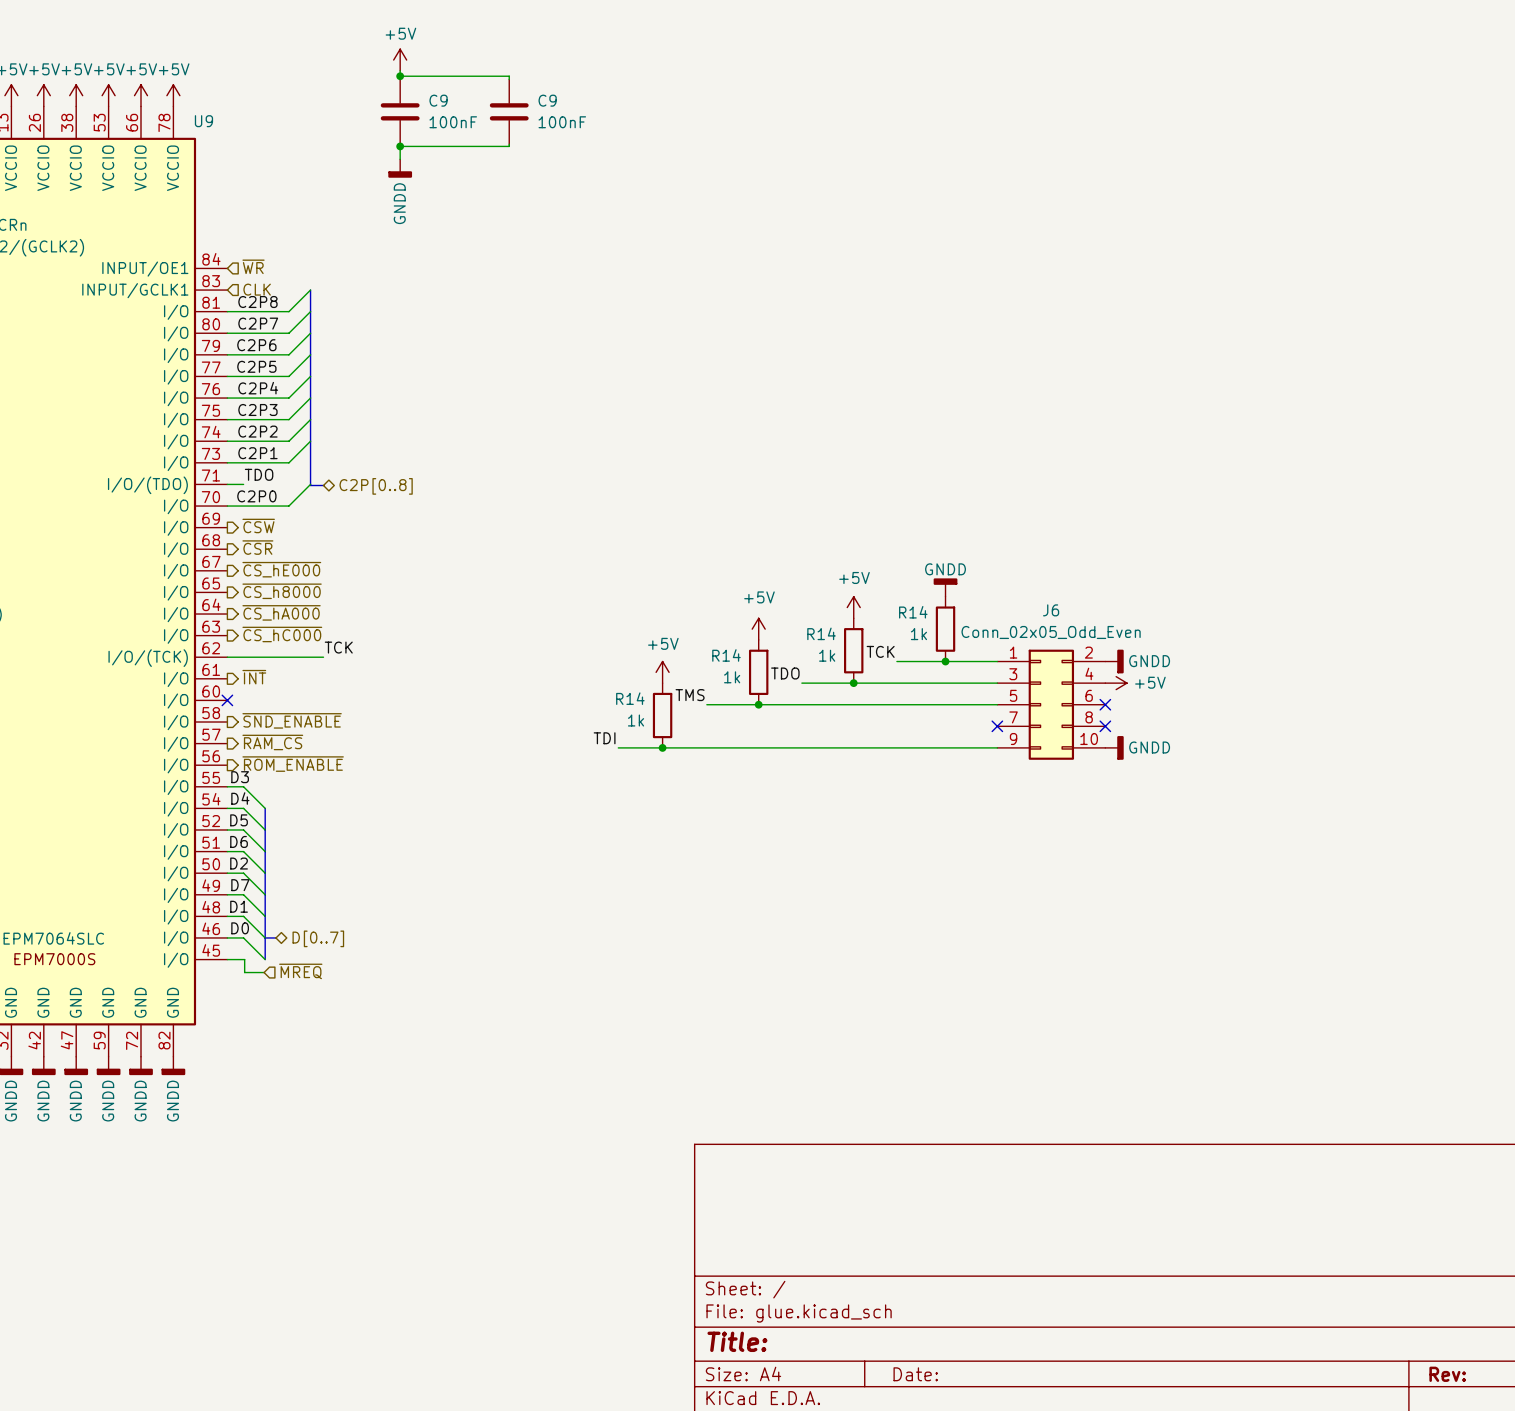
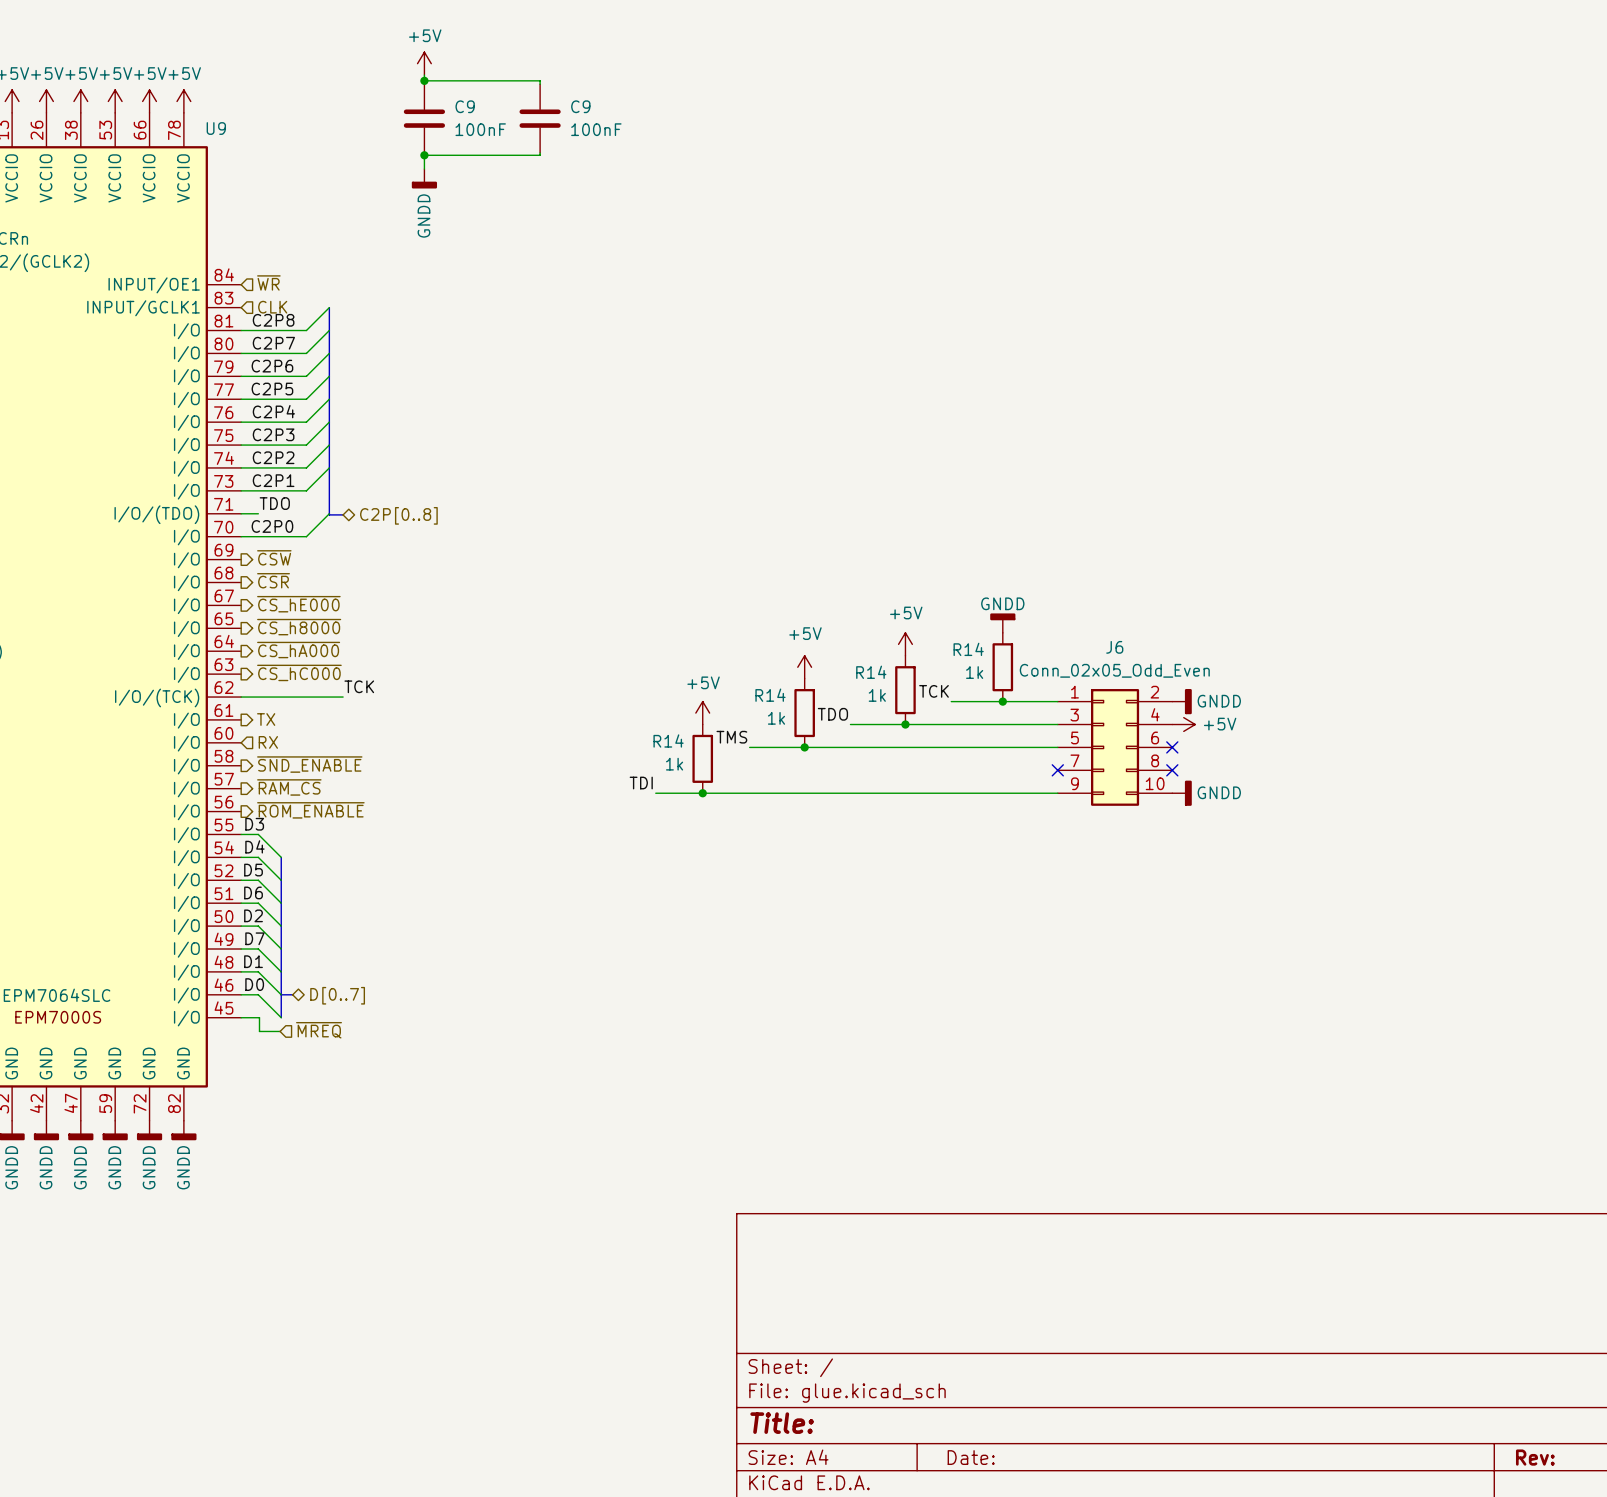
hierarchical label: ~{INT} (254, 677) -> TX (266, 719)
no-connect mark: (227, 700) -> none
hierarchical label: none -> RX (268, 742)

